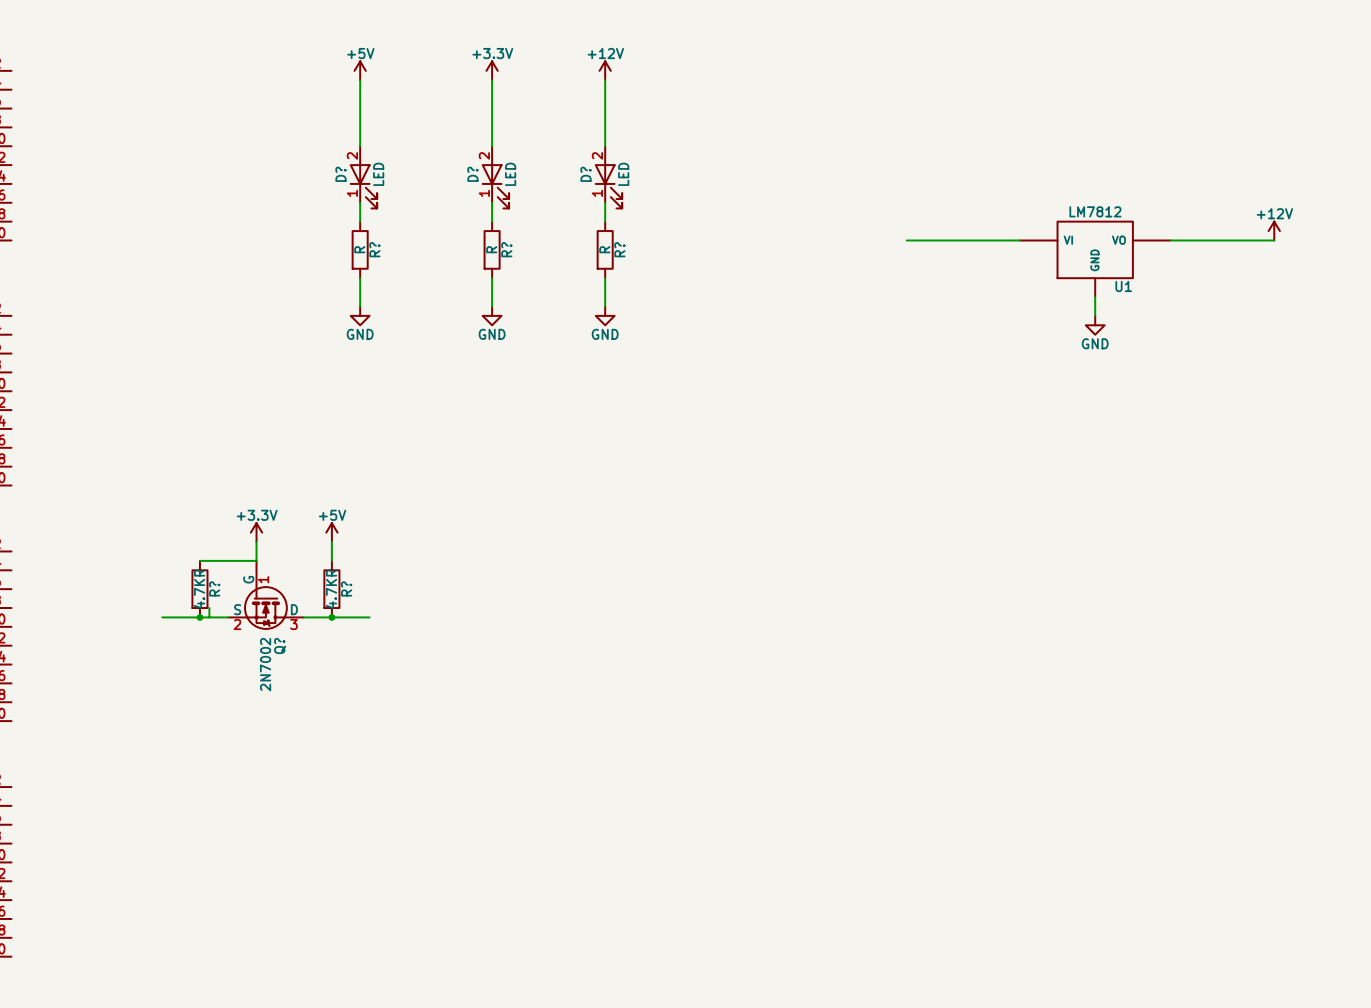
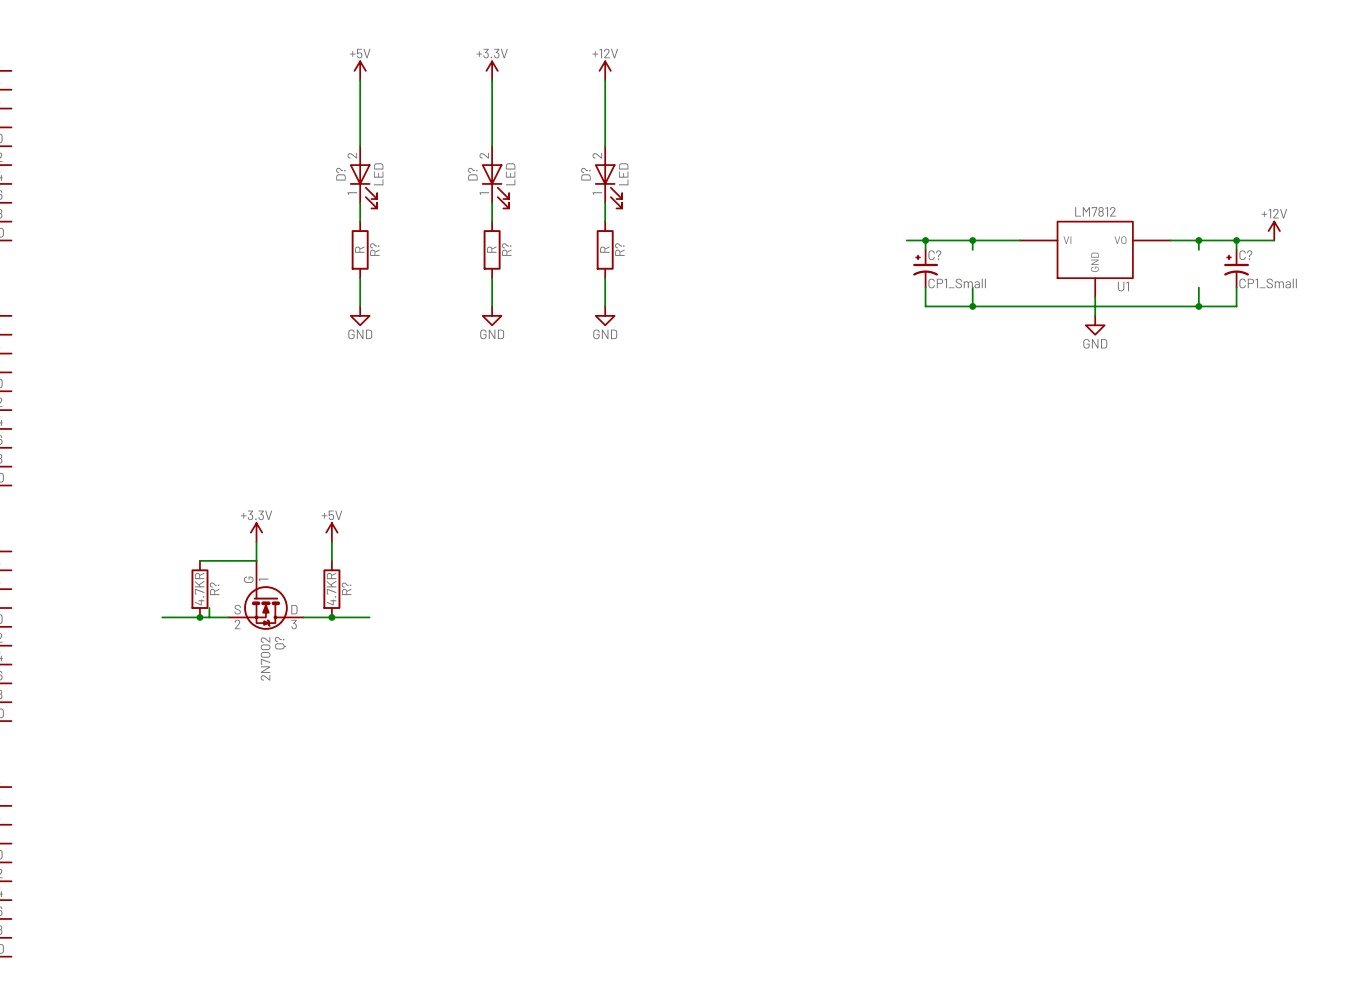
wire: none -> (925, 240) (925, 249)
junction: none -> (925, 240)
wire: none -> (972, 240) (972, 249)
junction: none -> (972, 240)
wire: none -> (1198, 240) (1198, 249)
junction: none -> (1198, 240)
wire: none -> (1236, 240) (1236, 249)
junction: none -> (1236, 240)
C?: none -> CP1_Small (925, 268)
C?: none -> CP1_Small (1236, 268)
wire: none -> (925, 287) (925, 306) (1236, 306) (1236, 287)
wire: none -> (972, 287) (972, 306)
wire: none -> (1198, 287) (1198, 306)
junction: none -> (972, 306)
junction: none -> (1198, 306)

